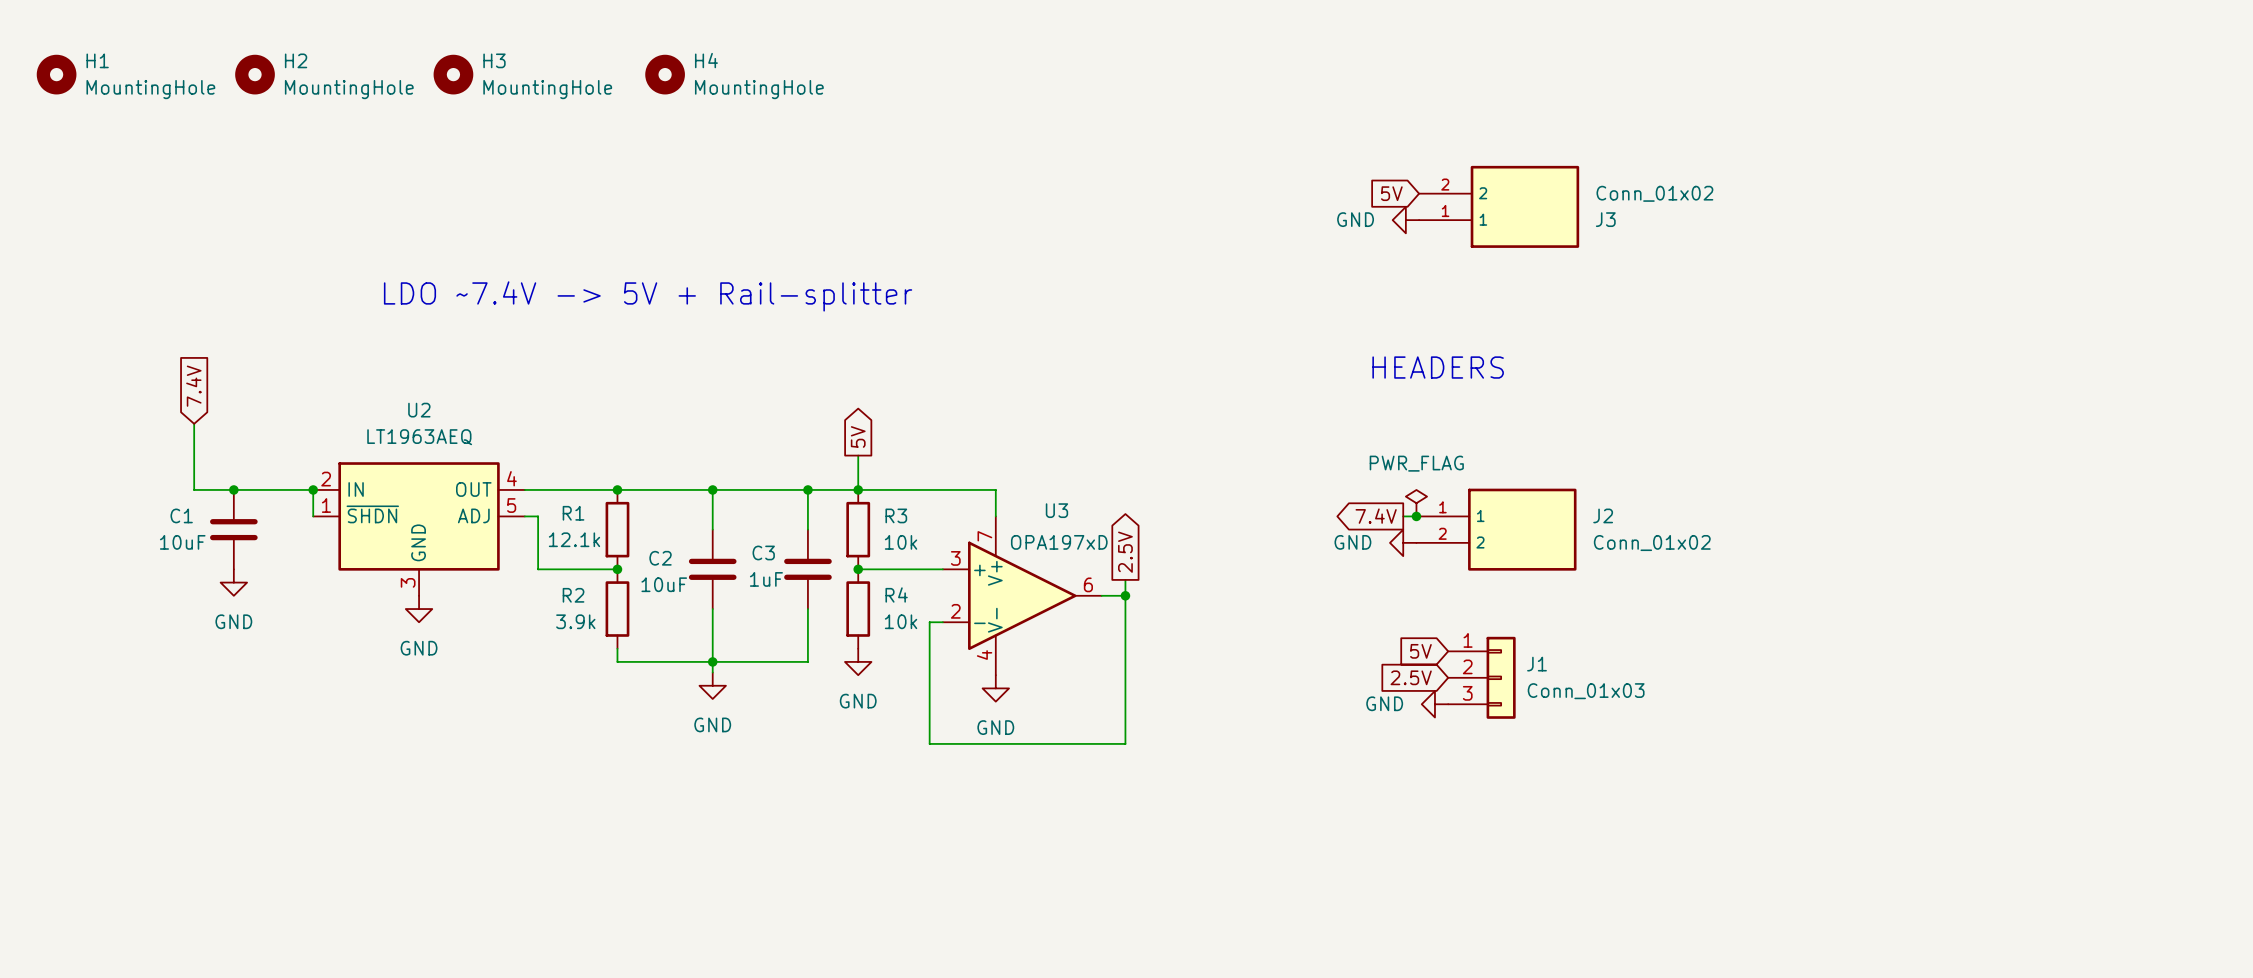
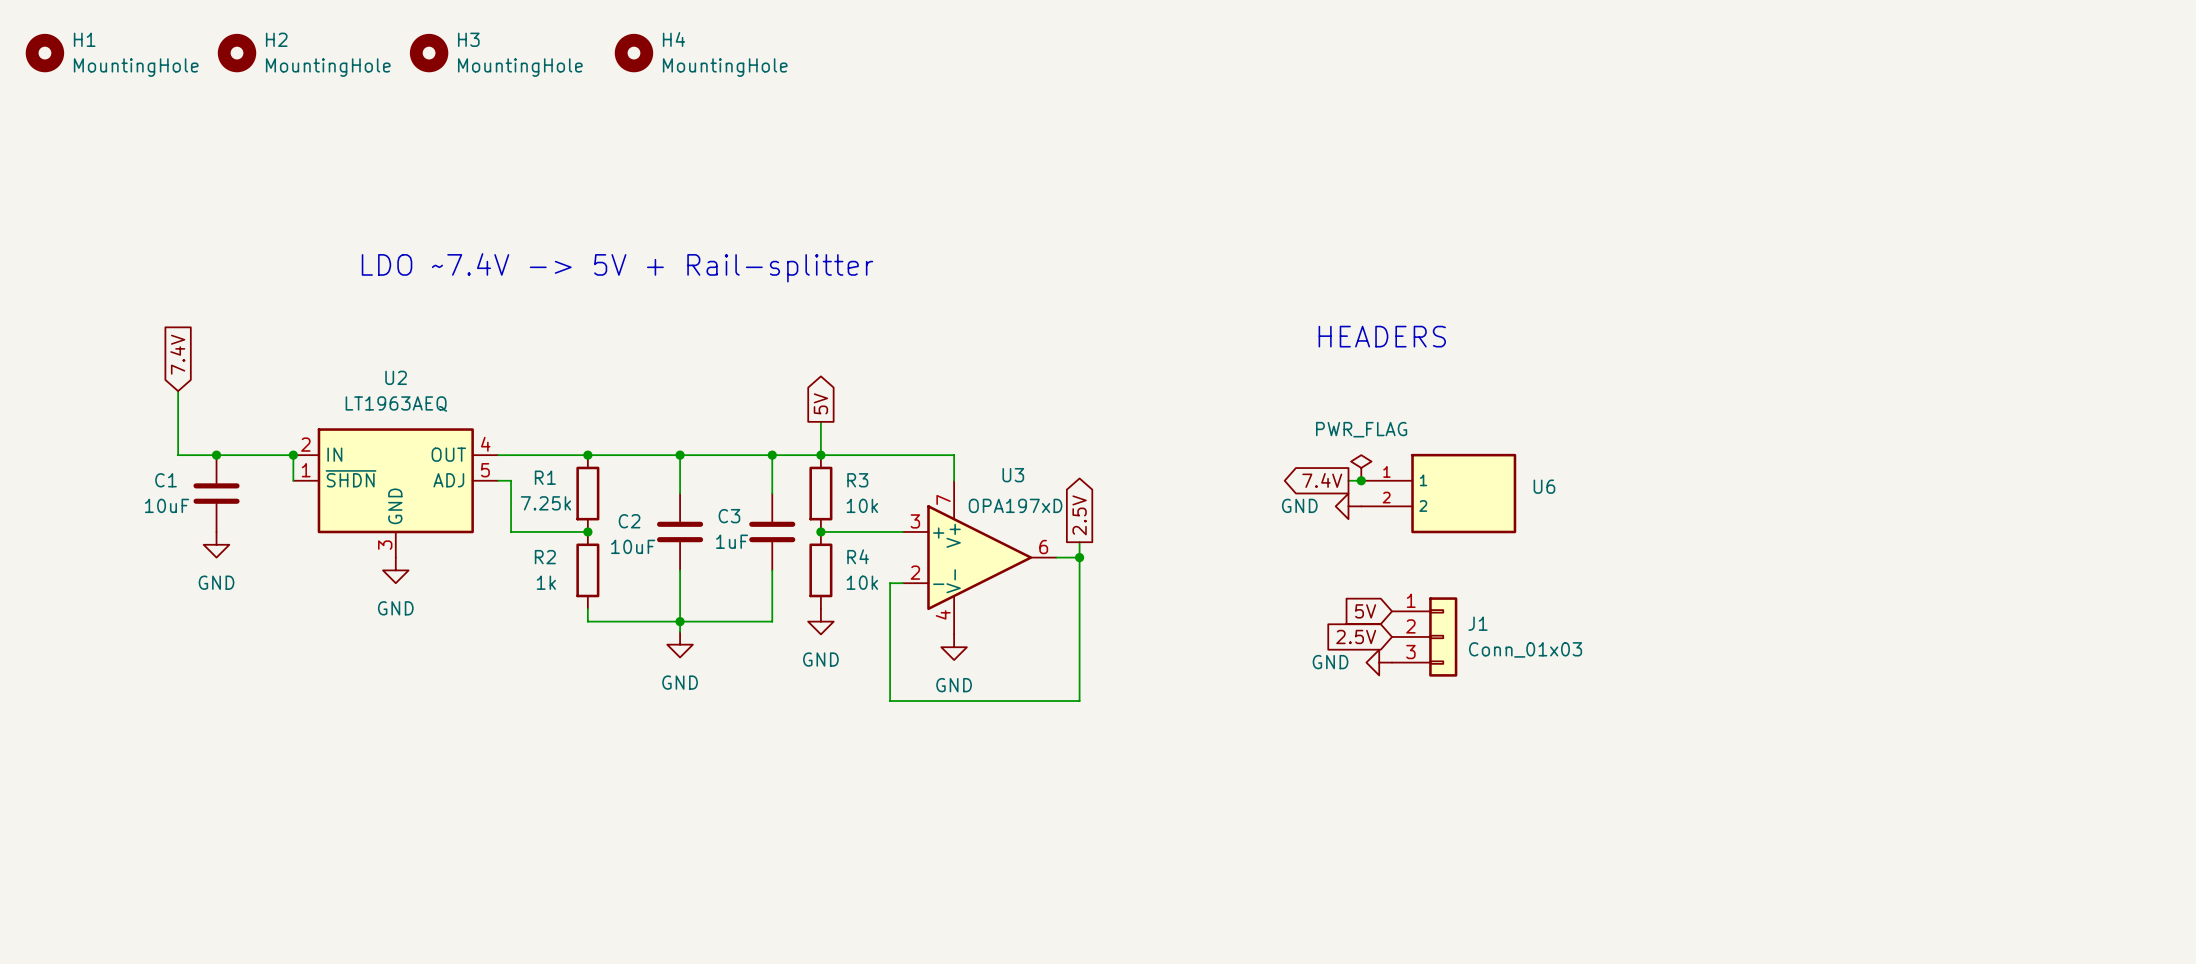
global label: 5V (1391, 193) -> none
J3: Conn_01x02 (1499, 206) -> none
power symbol: GND (1405, 220) -> none
J2 name: J2 (1603, 515) -> U6 (1544, 486)
R1 value: 12.1k (574, 539) -> 7.25k (545, 503)
J2 value: Conn_01x02 (1652, 543) -> none
R2 value: 3.9k (575, 621) -> 1k (546, 582)

